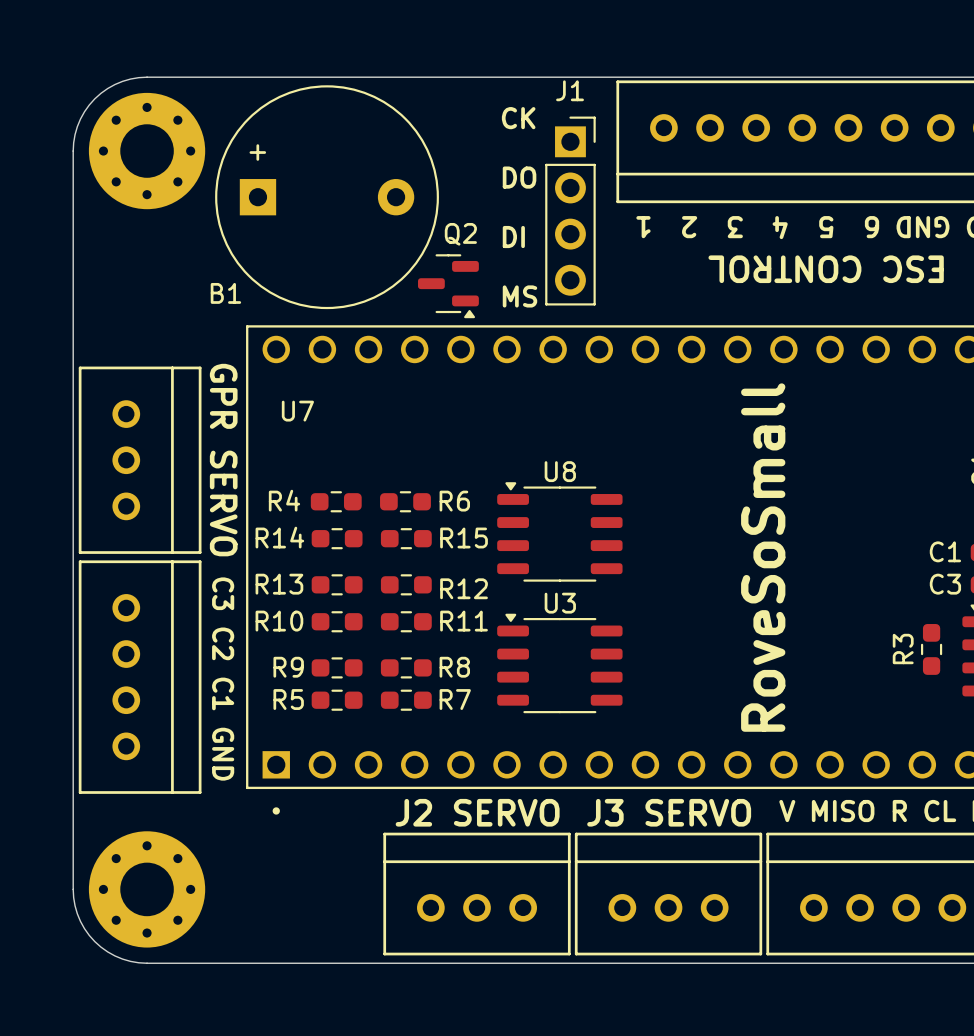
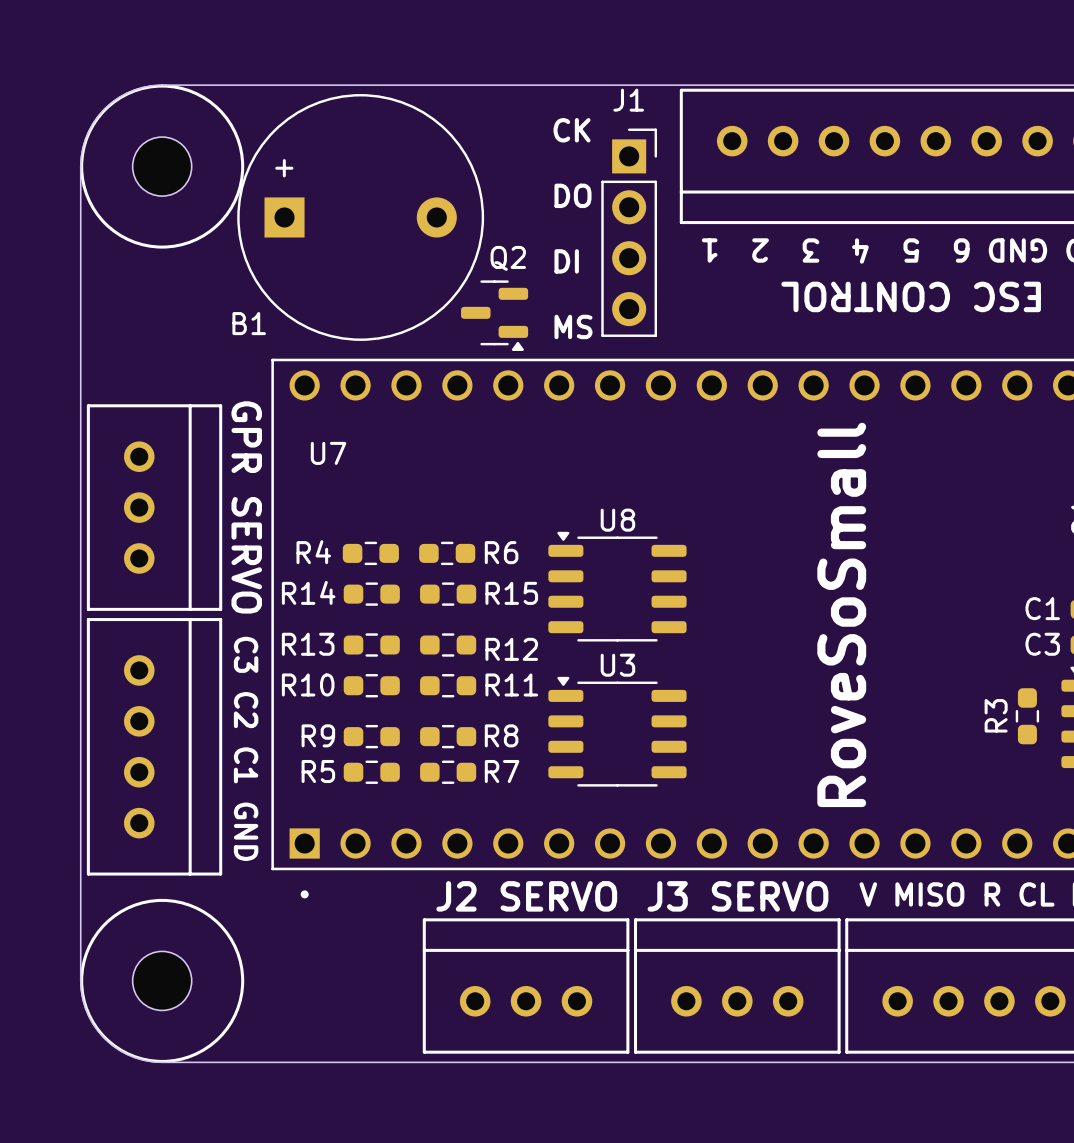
part footprint: [88, 92, 206, 210] -> [80, 84, 245, 249]
part footprint: [88, 831, 206, 948] -> [80, 898, 245, 1063]

